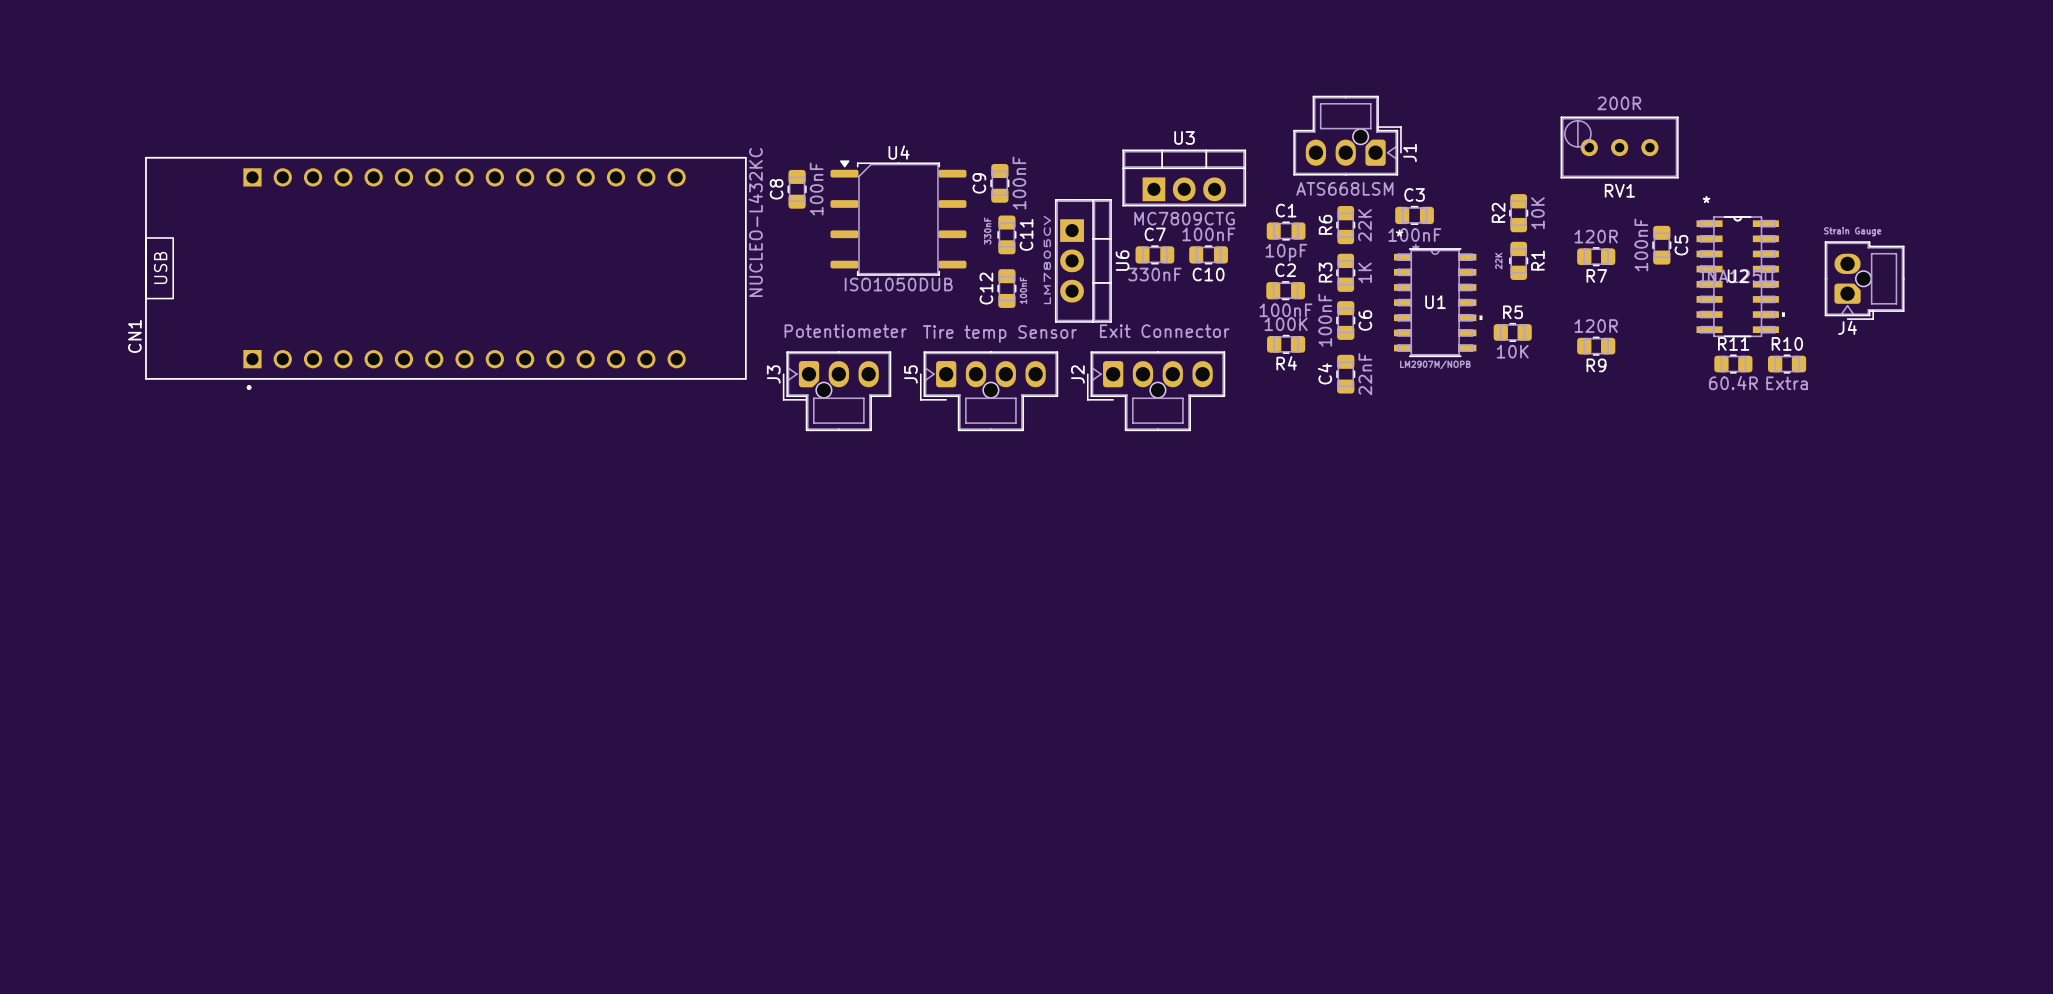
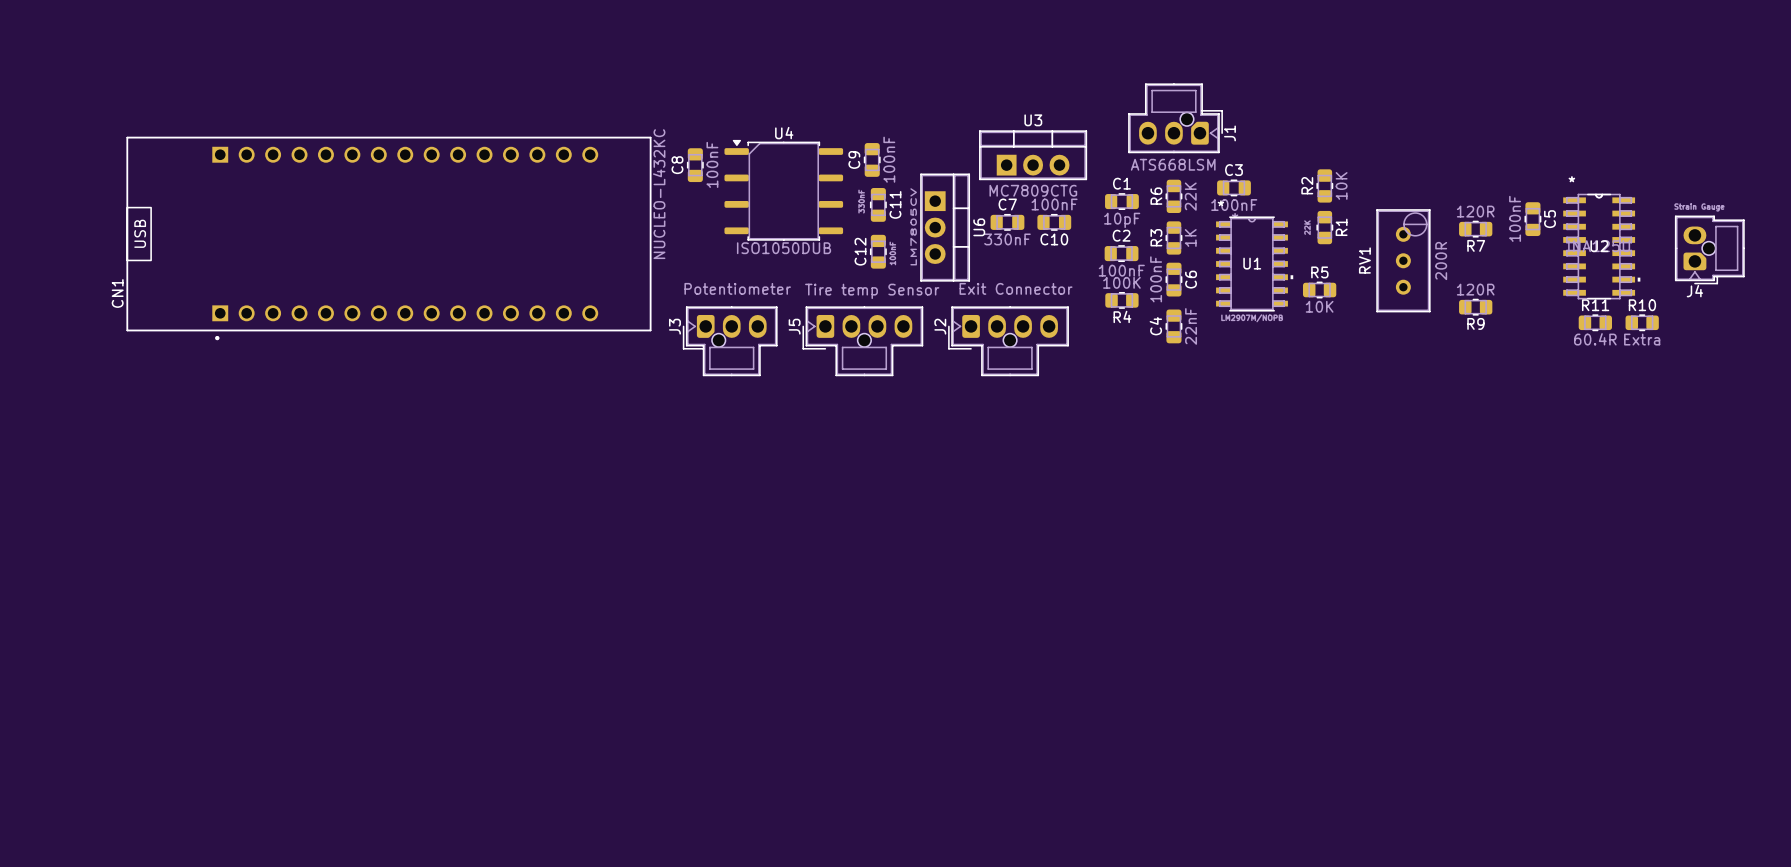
RV1 value position: 200R (1619, 103) -> 200R (1441, 261)
RV1 footprint: [1560, 116, 1679, 179] -> [1376, 209, 1431, 313]
RV1 name position: RV1 (1619, 190) -> RV1 (1364, 260)
C5 position: (1661, 245) -> (1532, 219)
R7 position: (1596, 256) -> (1475, 229)
U2 position: (1740, 276) -> (1601, 246)
J4 position: (1864, 280) -> (1709, 249)
R9 position: (1596, 346) -> (1475, 307)
R11 position: (1733, 364) -> (1595, 322)
R10 position: (1787, 364) -> (1642, 322)

